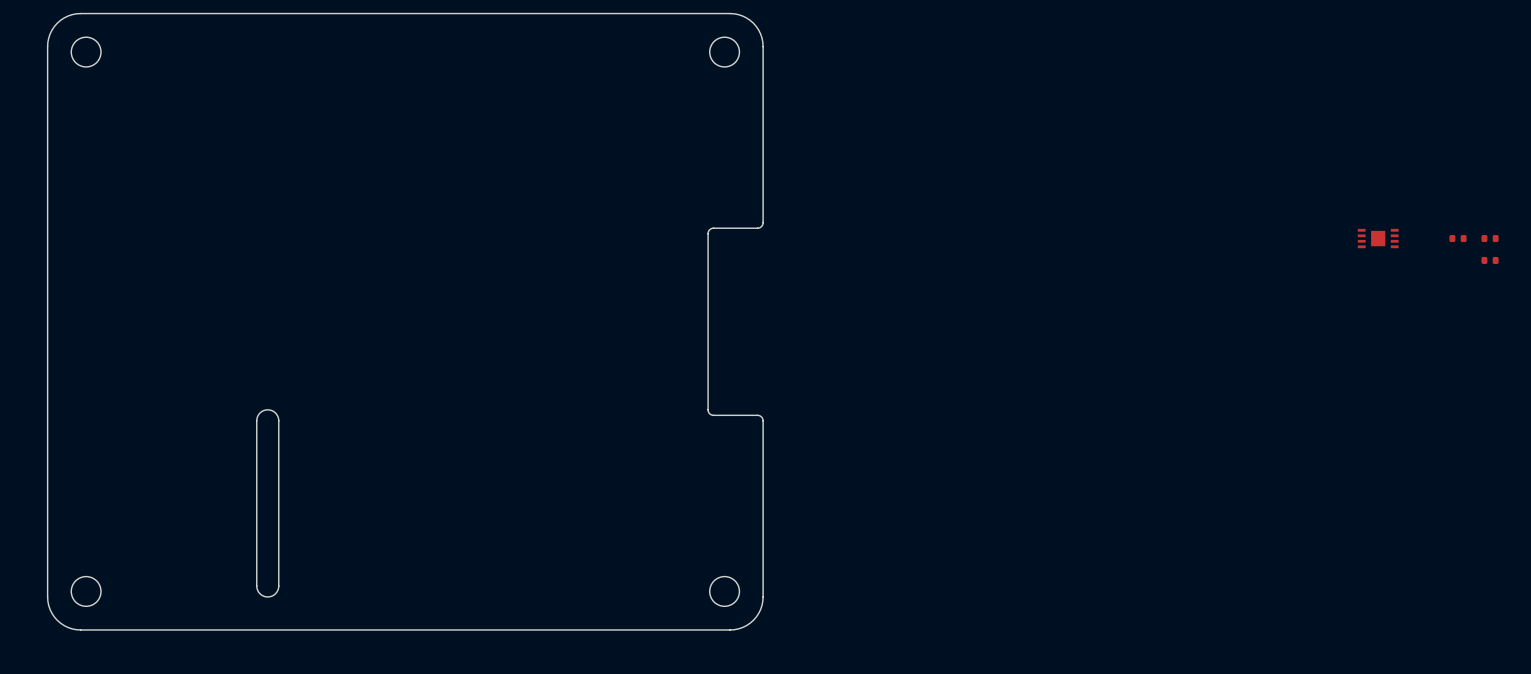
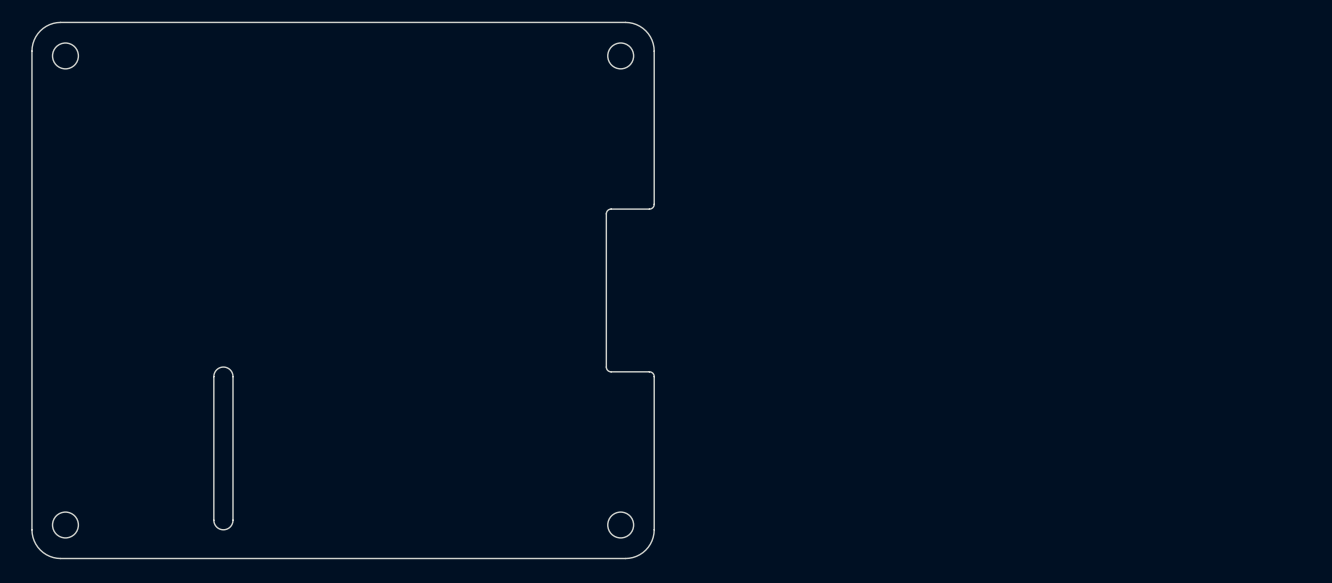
part: (1378, 238) -> none
part: (1458, 238) -> none
part: (1490, 238) -> none
part: (1490, 260) -> none

